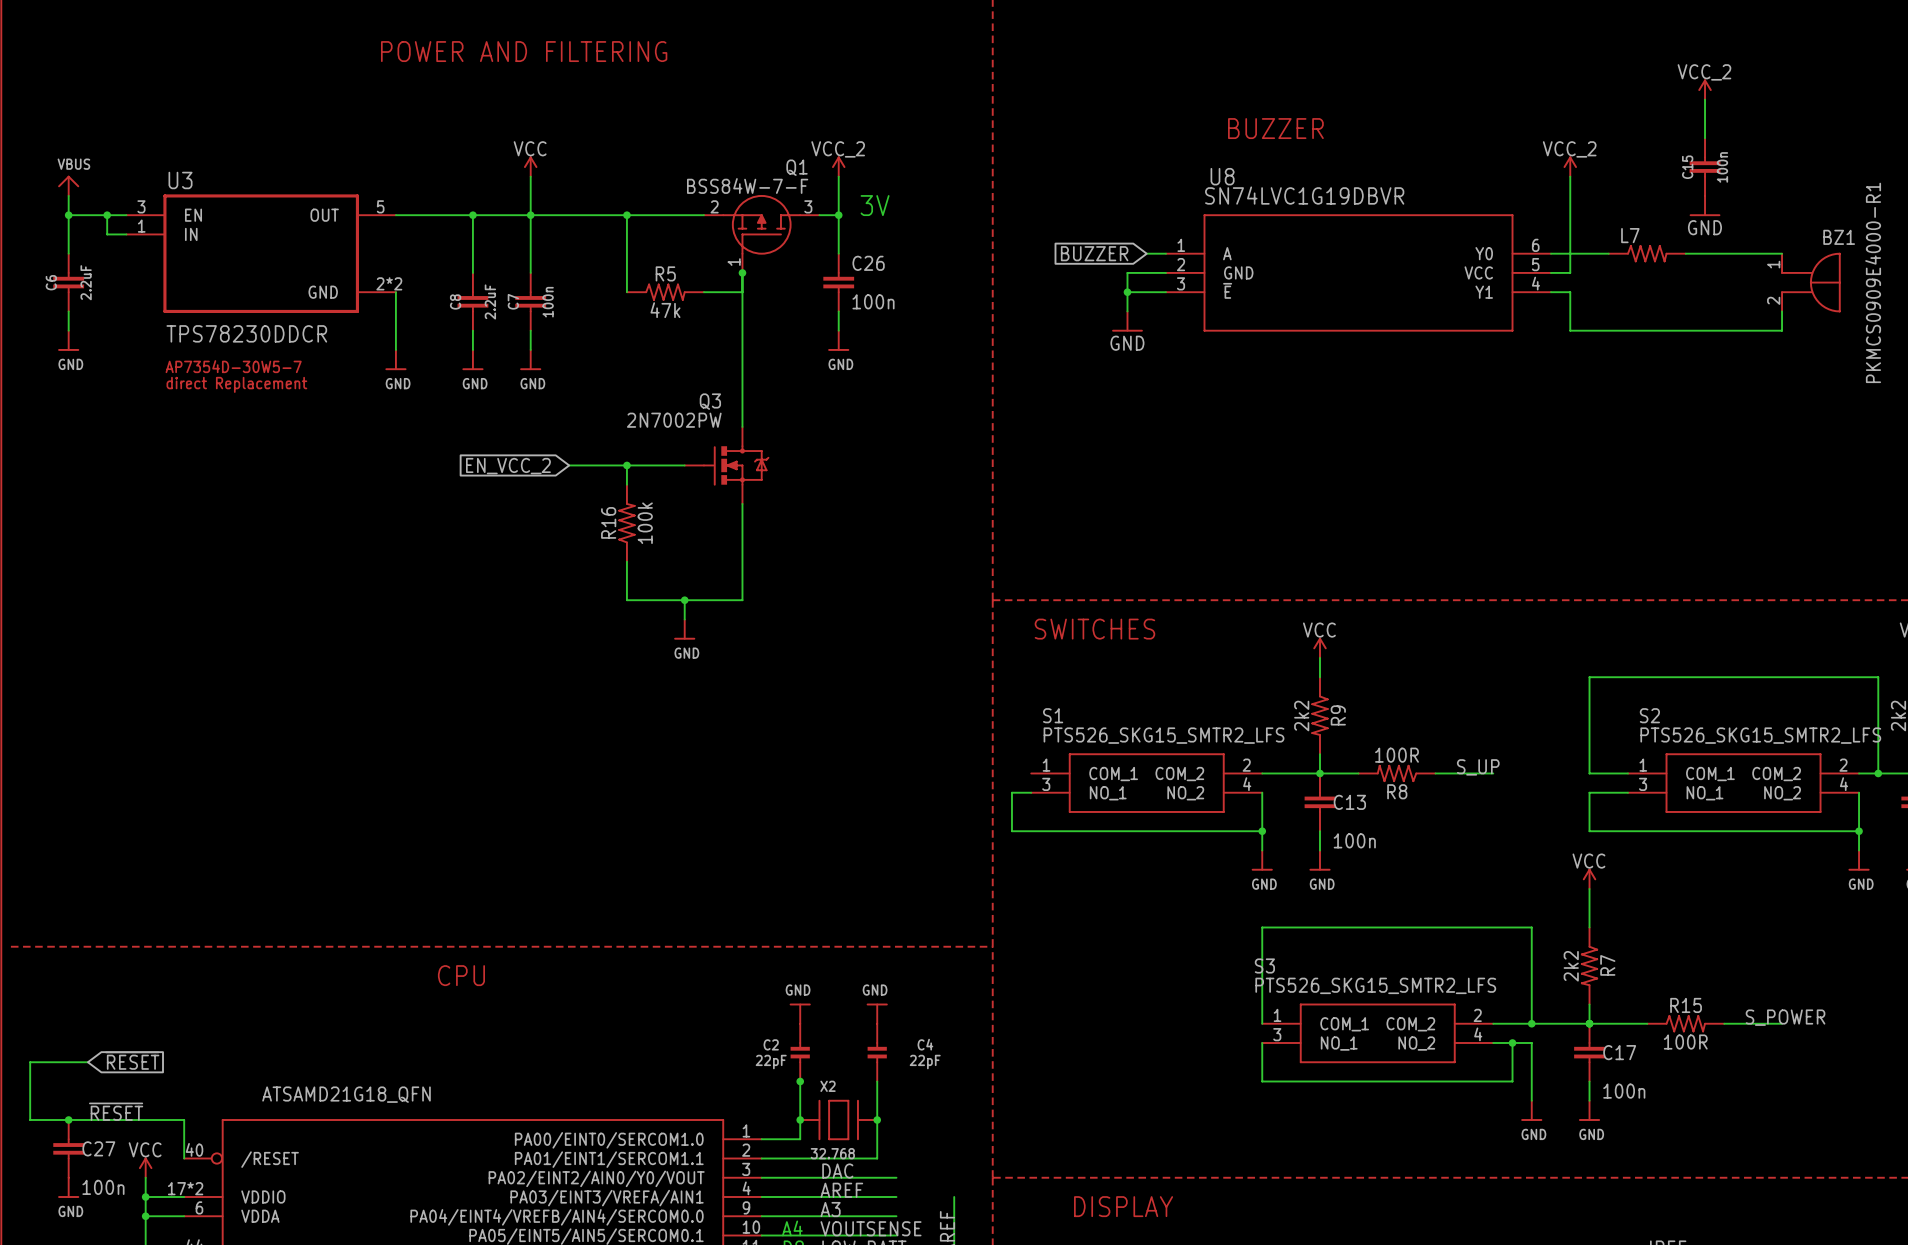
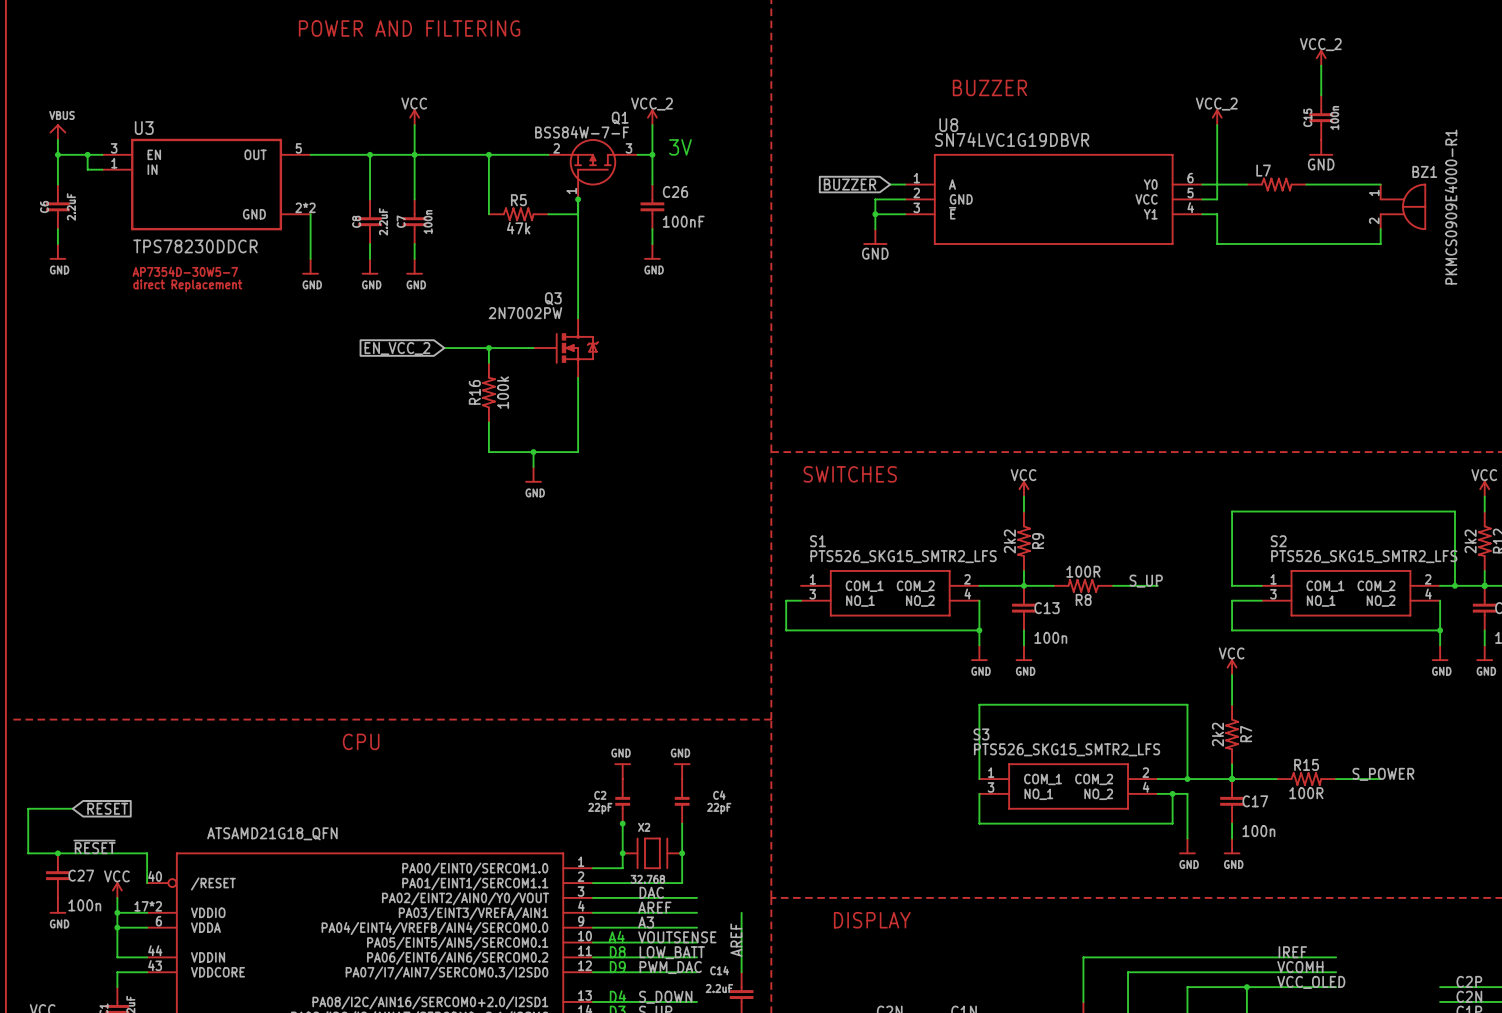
C26 value: 100n (873, 301) -> 100nF (683, 221)

